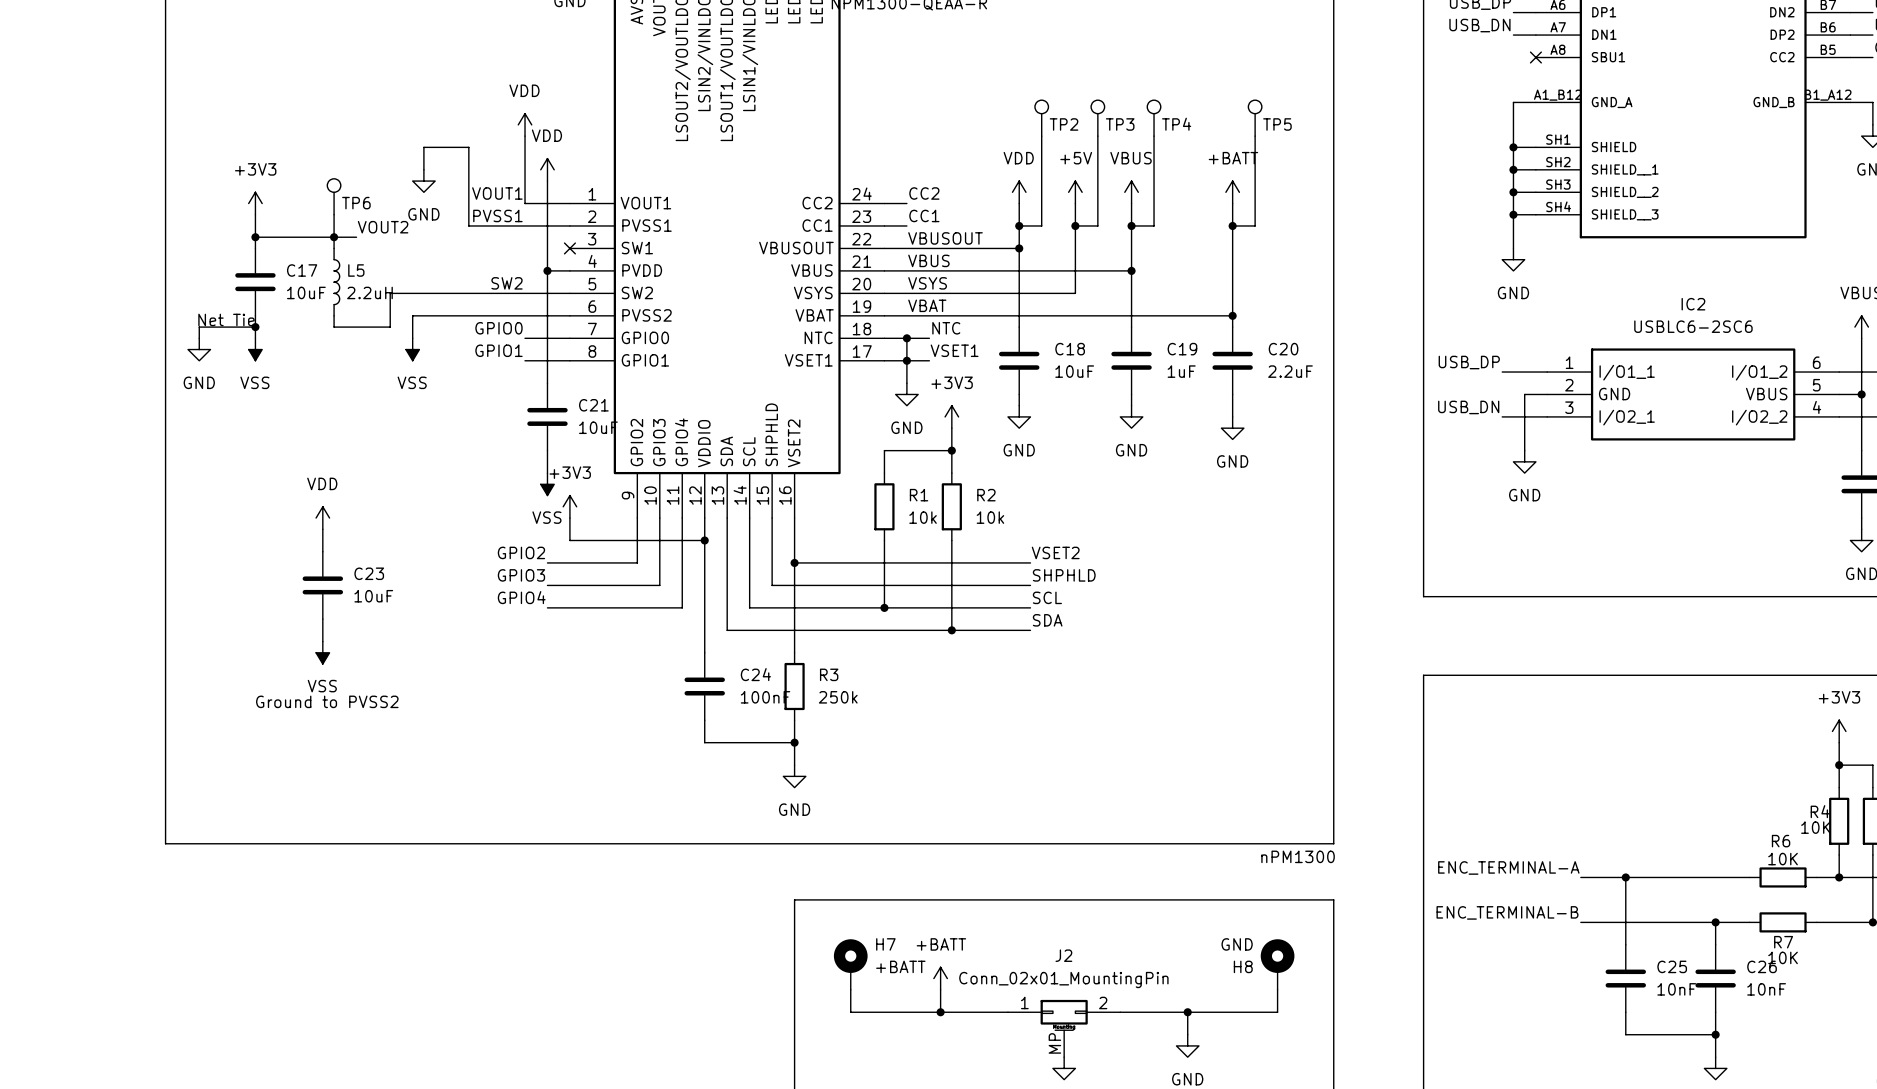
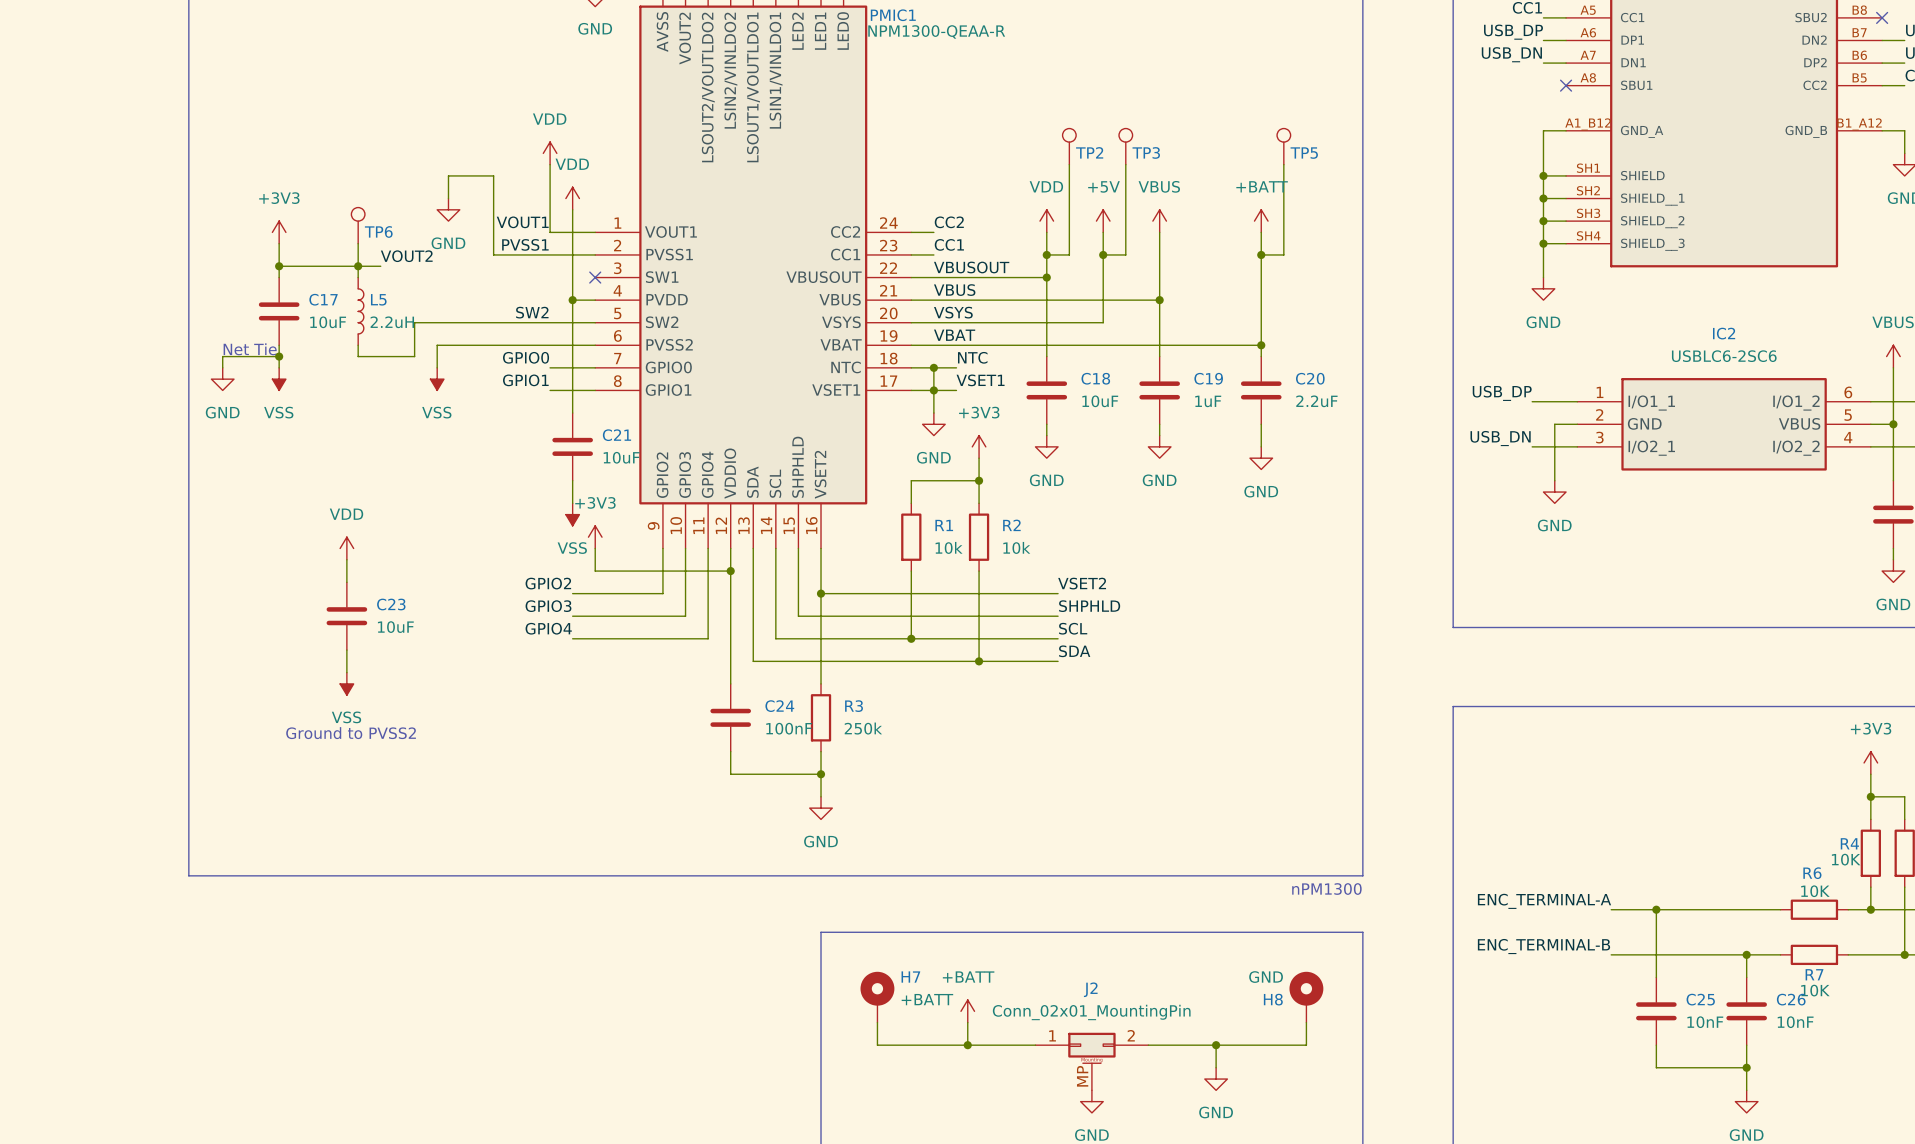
TP4: (1154, 118) -> none
wire: (1154, 136) (1154, 225) (1131, 225) -> none
junction: (1131, 225) -> none

